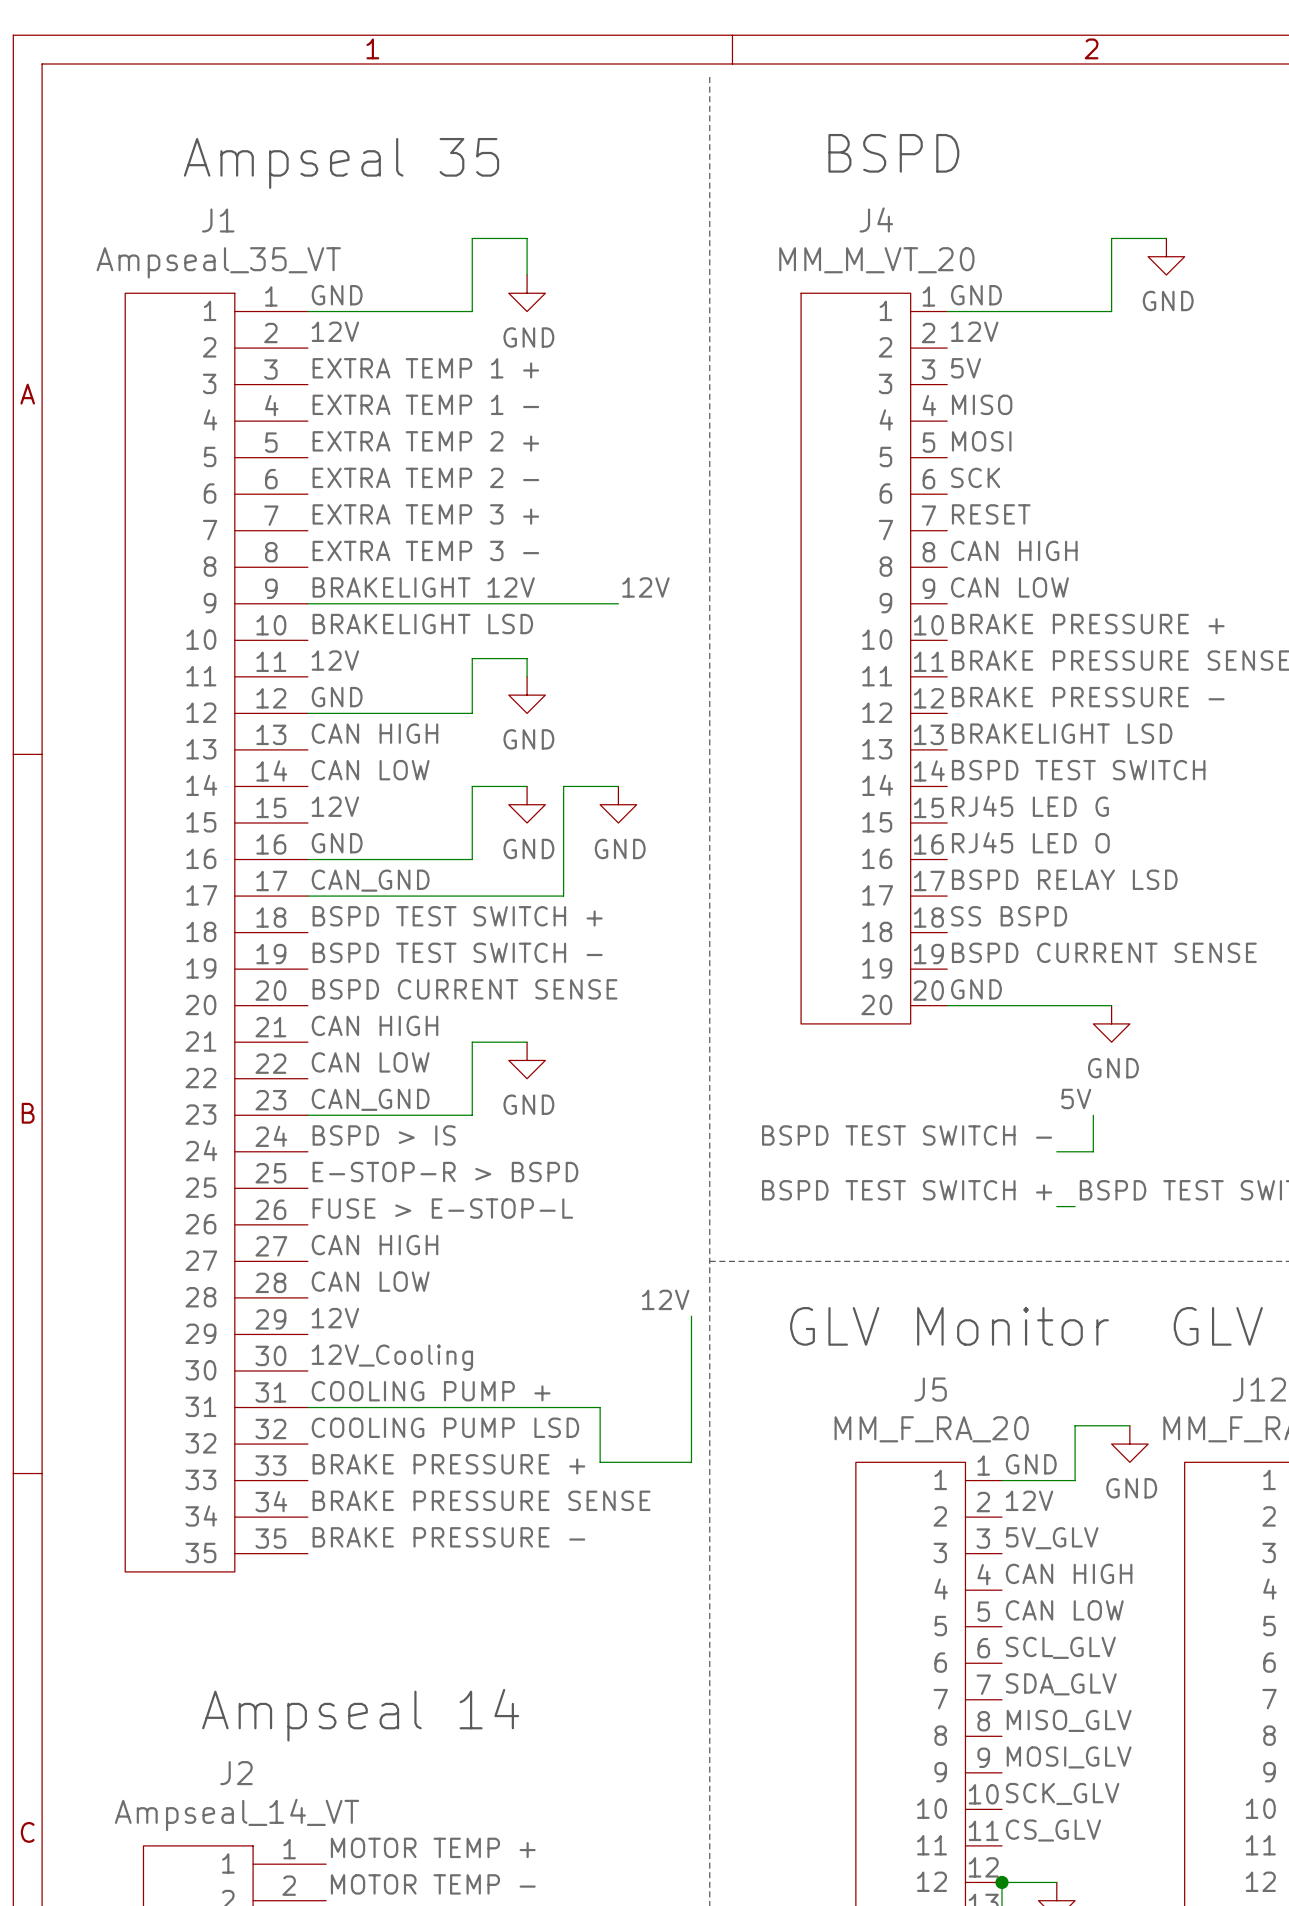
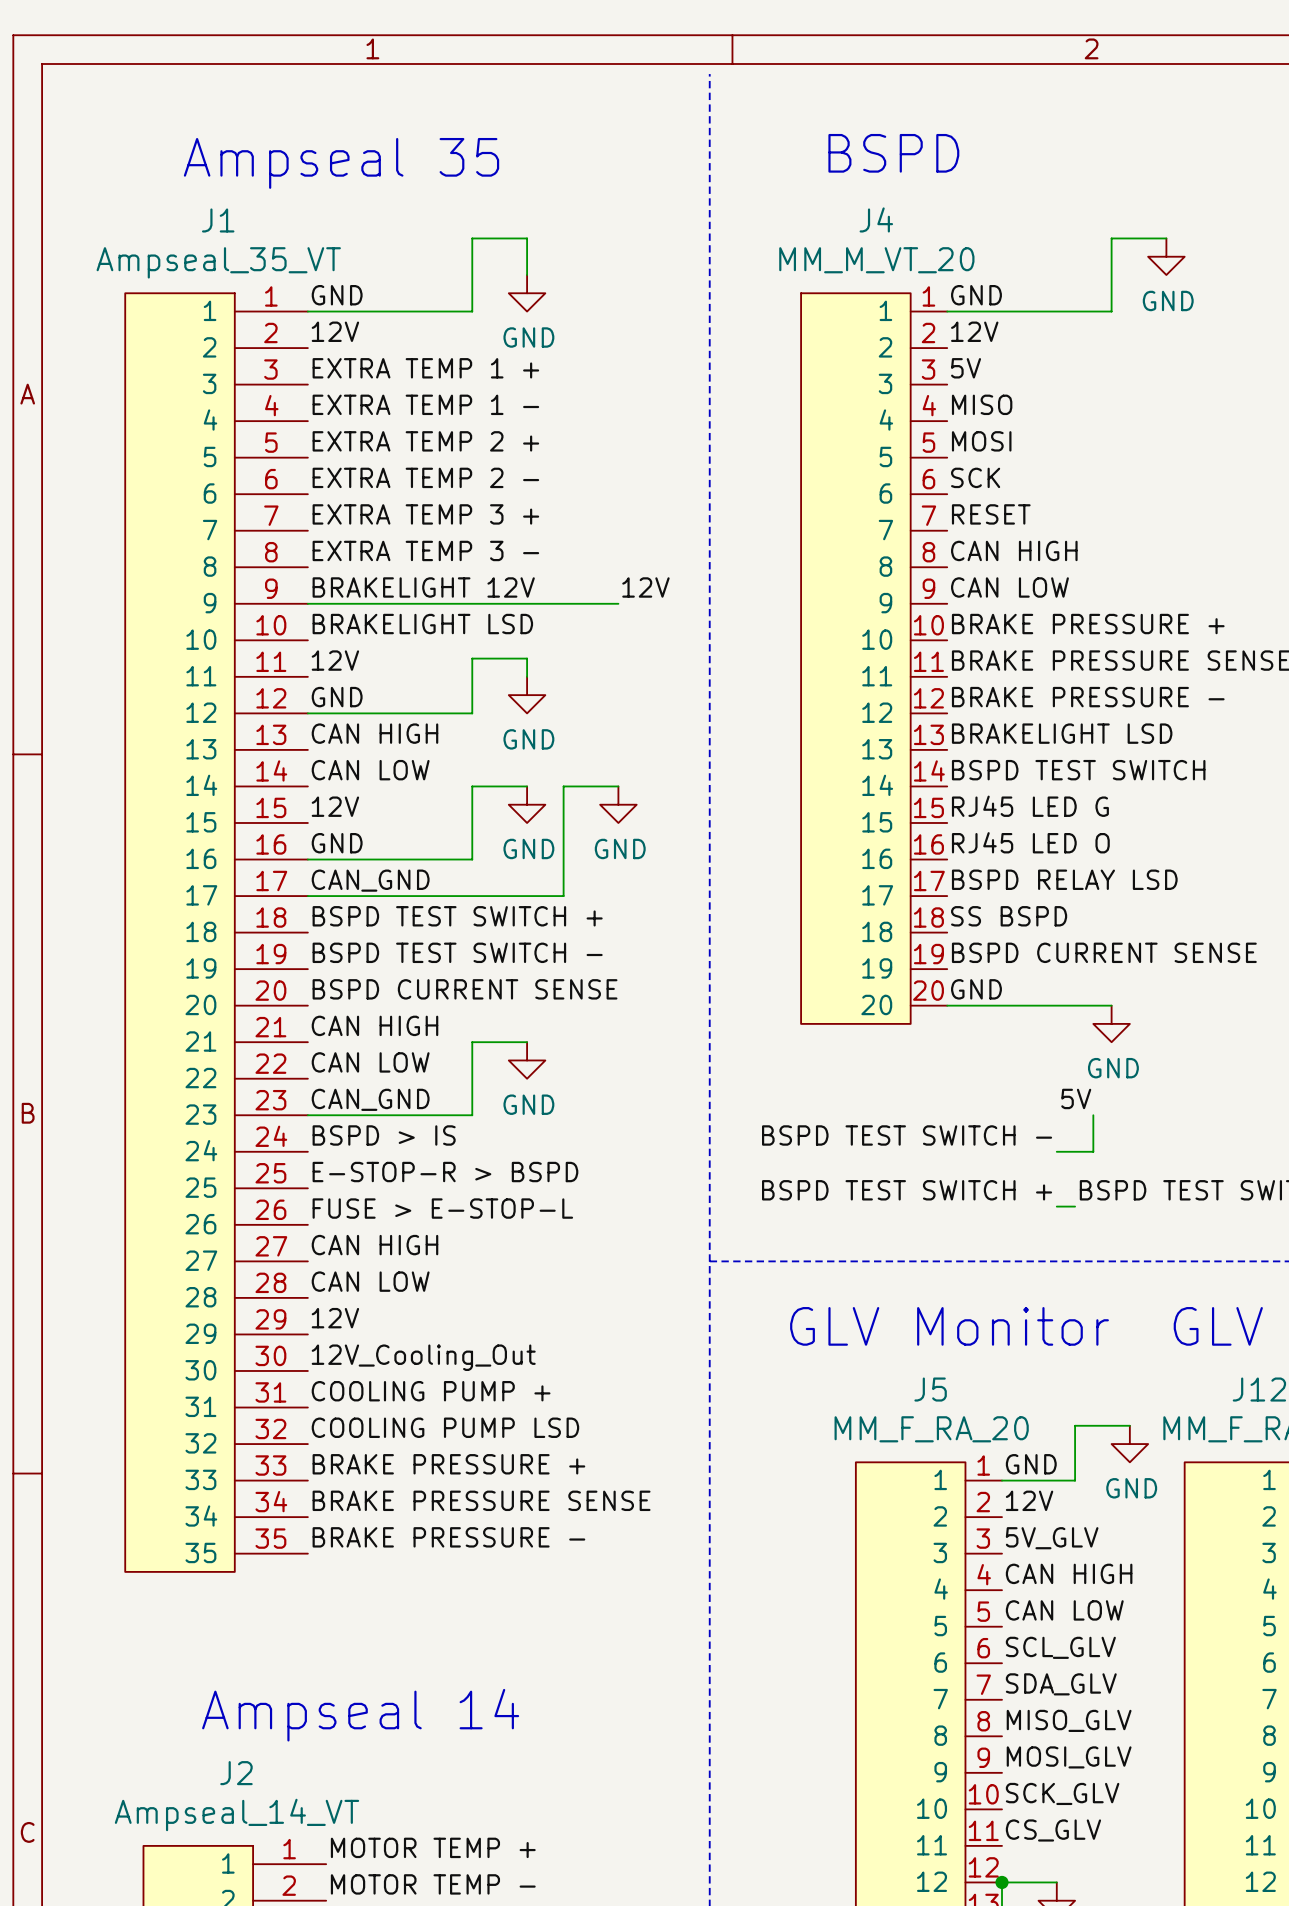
label: 12V (665, 1299) -> none
wire: (691, 1316) (691, 1462) (600, 1462) (600, 1407) (307, 1407) -> none
label: 12V_Cooling (392, 1357) -> 12V_Cooling_Out (423, 1357)

